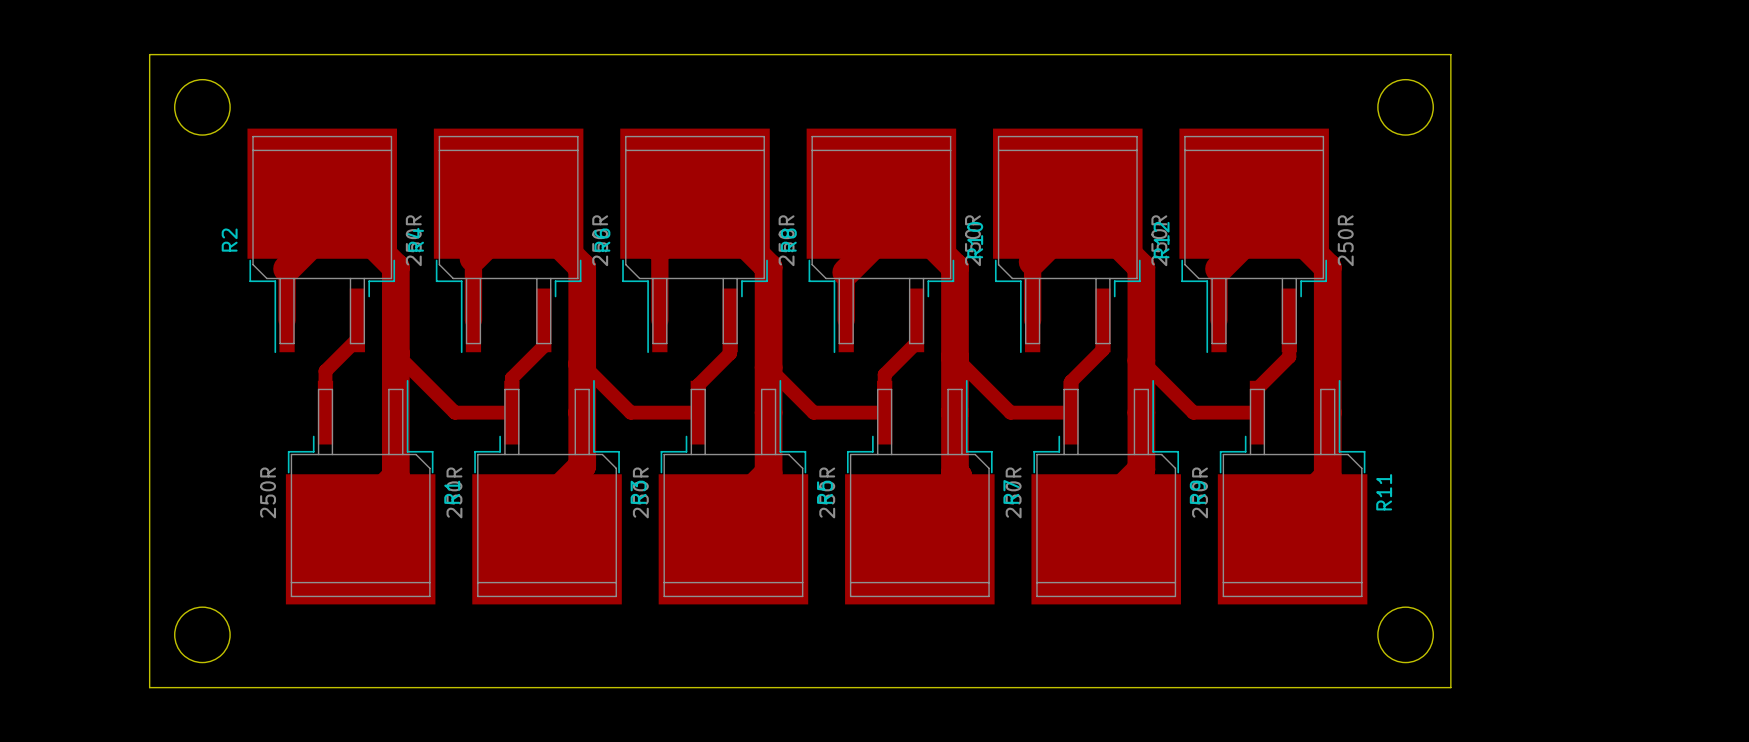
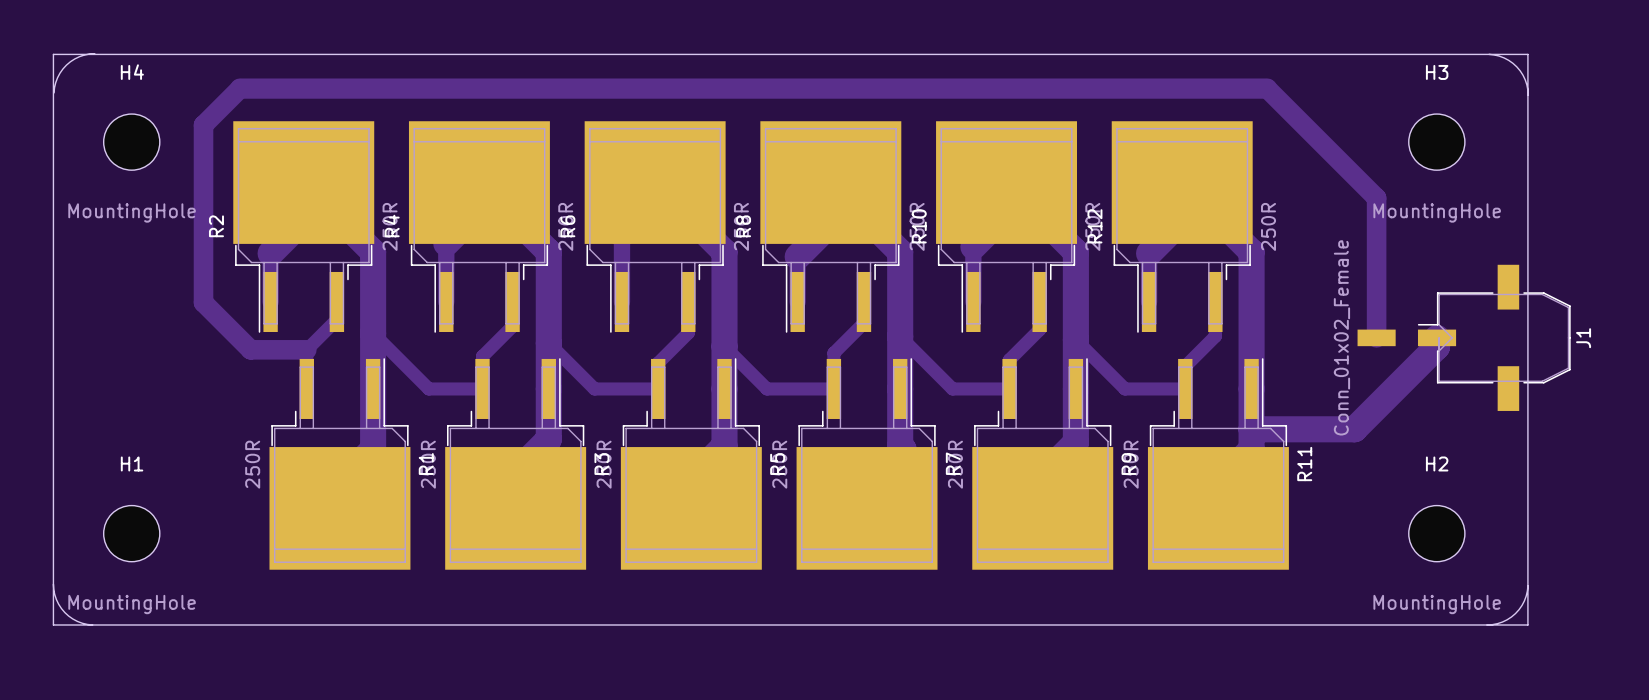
board edge: (149, 54) (1450, 54) (1450, 687) (149, 687) (149, 54) -> (53, 54) (53, 625) (1527, 625) (1527, 54) (53, 54)
board edge: none -> (94, 53) (79, 56) (66, 65) (57, 77) (53, 92)
board edge: none -> (1489, 54) (1504, 57) (1516, 66) (1525, 79) (1528, 95)
round board edge: [174, 78, 231, 136] -> none
round board edge: [1377, 78, 1434, 136] -> none
H4: none -> MountingHole (131, 142)
H3: none -> MountingHole (1436, 142)
track: none -> (1376, 337) (1376, 198) (1267, 88) (240, 88) (203, 125) (203, 302) (250, 349) (306, 349)
track: none -> (1437, 337) (1437, 346) (1354, 429) (1251, 429)
J1: none -> Conn_01x02_Female (1464, 337)
H1: none -> MountingHole (131, 533)
H2: none -> MountingHole (1436, 533)
round board edge: [174, 606, 231, 664] -> none
round board edge: [1377, 606, 1434, 664] -> none
board edge: none -> (53, 584) (56, 599) (64, 612) (77, 621) (92, 625)
board edge: none -> (1527, 585) (1524, 600) (1515, 613) (1502, 622) (1487, 625)

